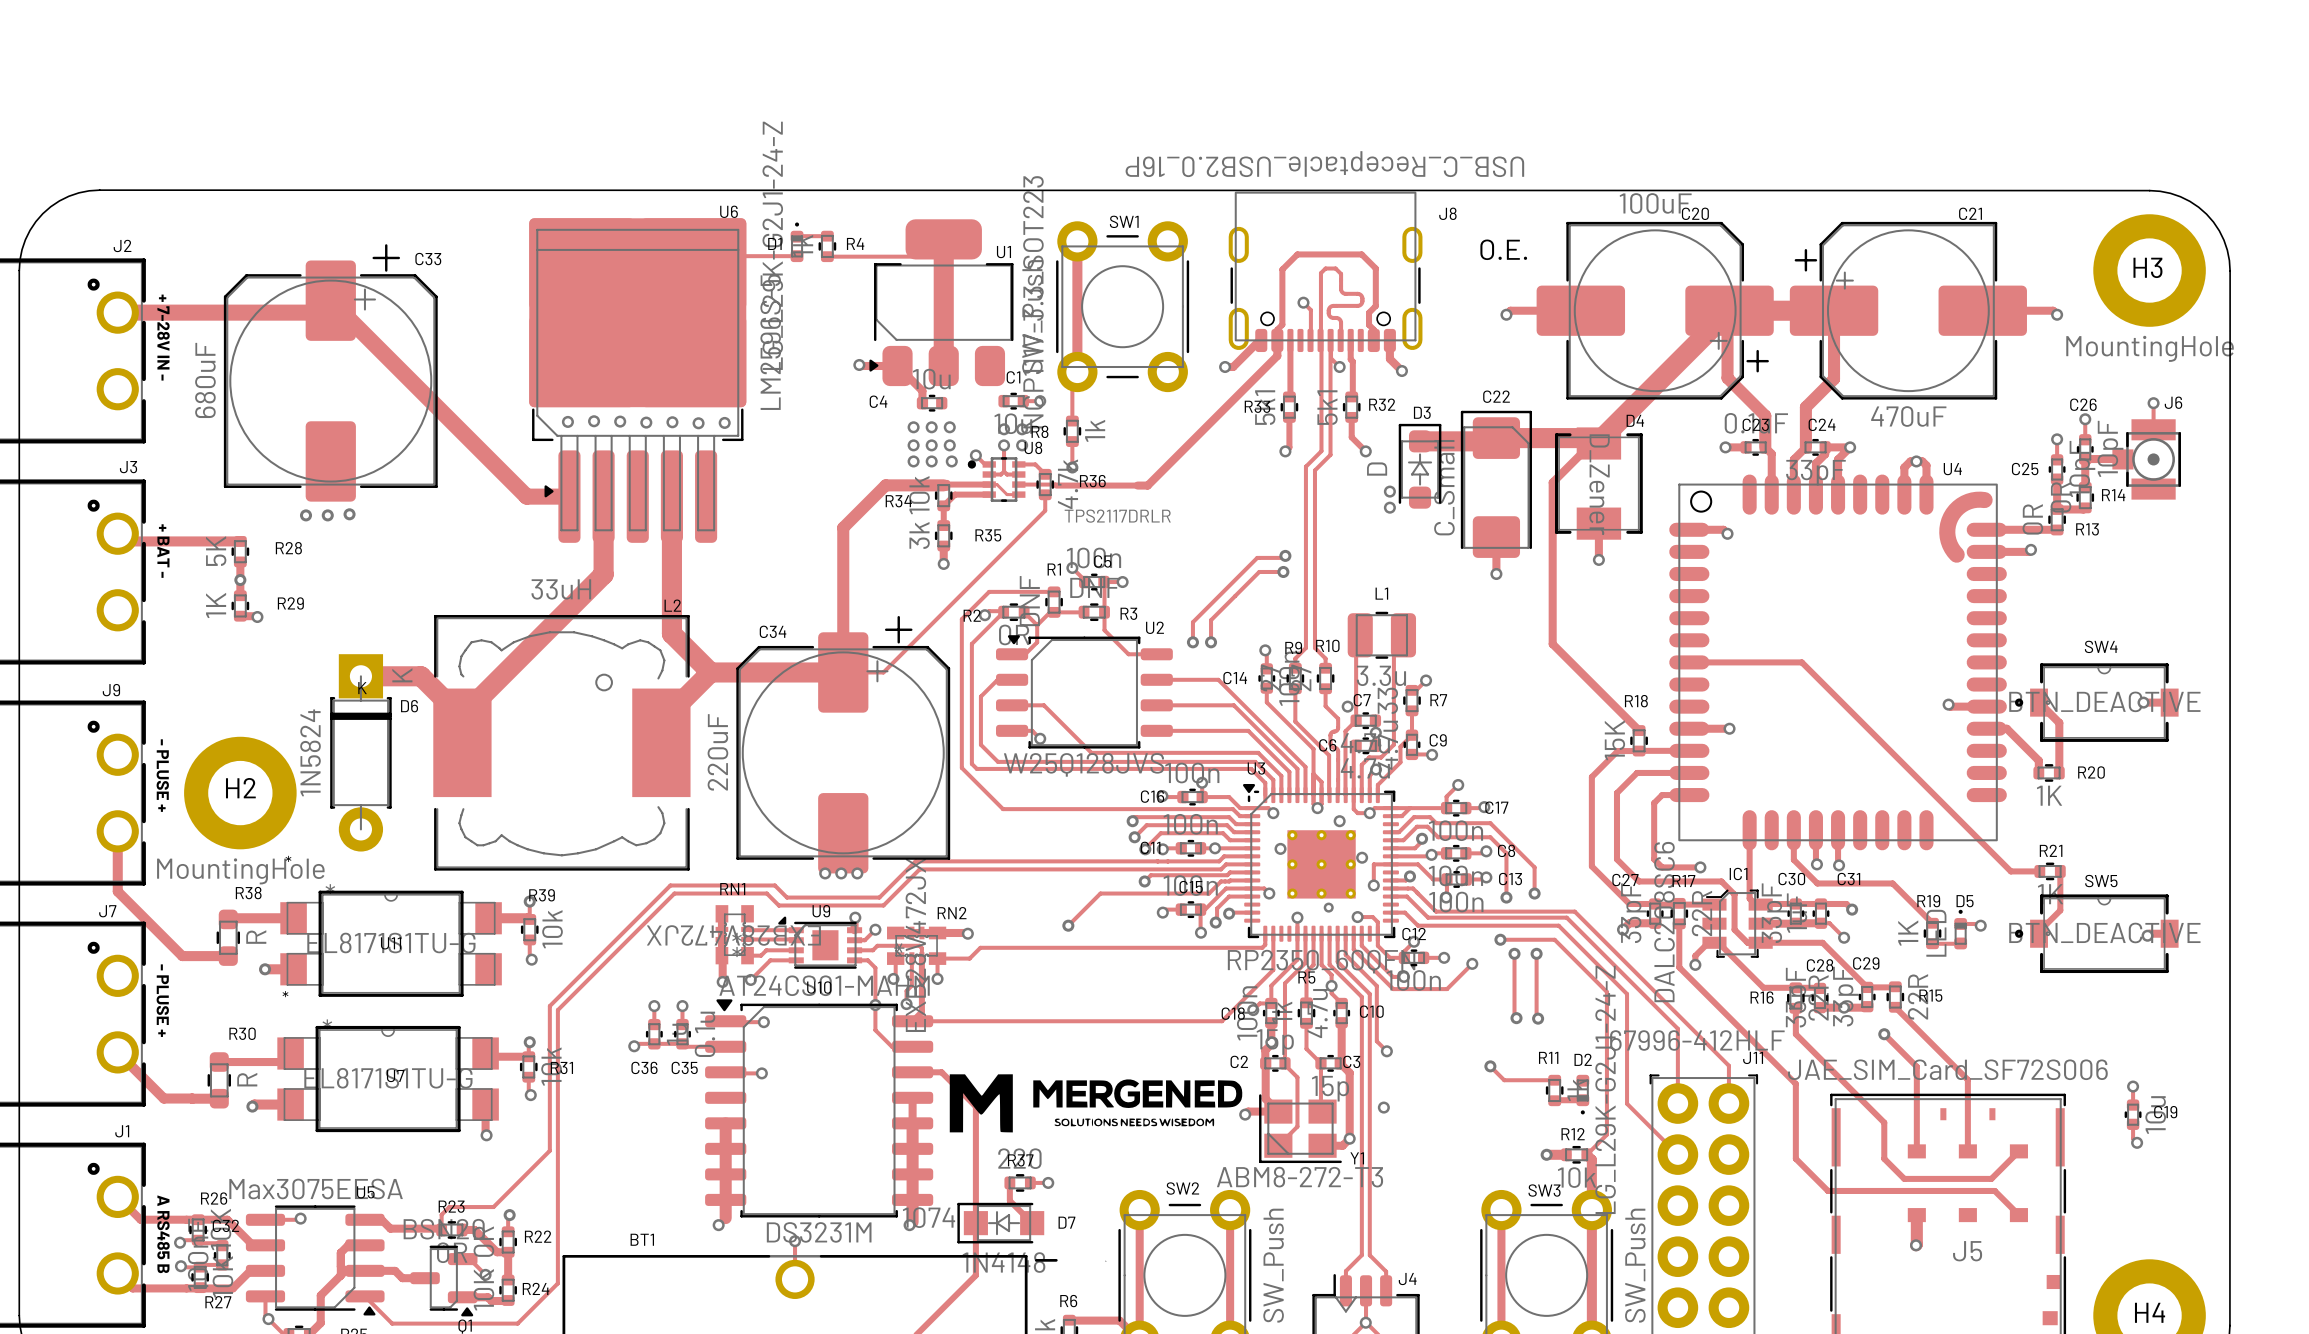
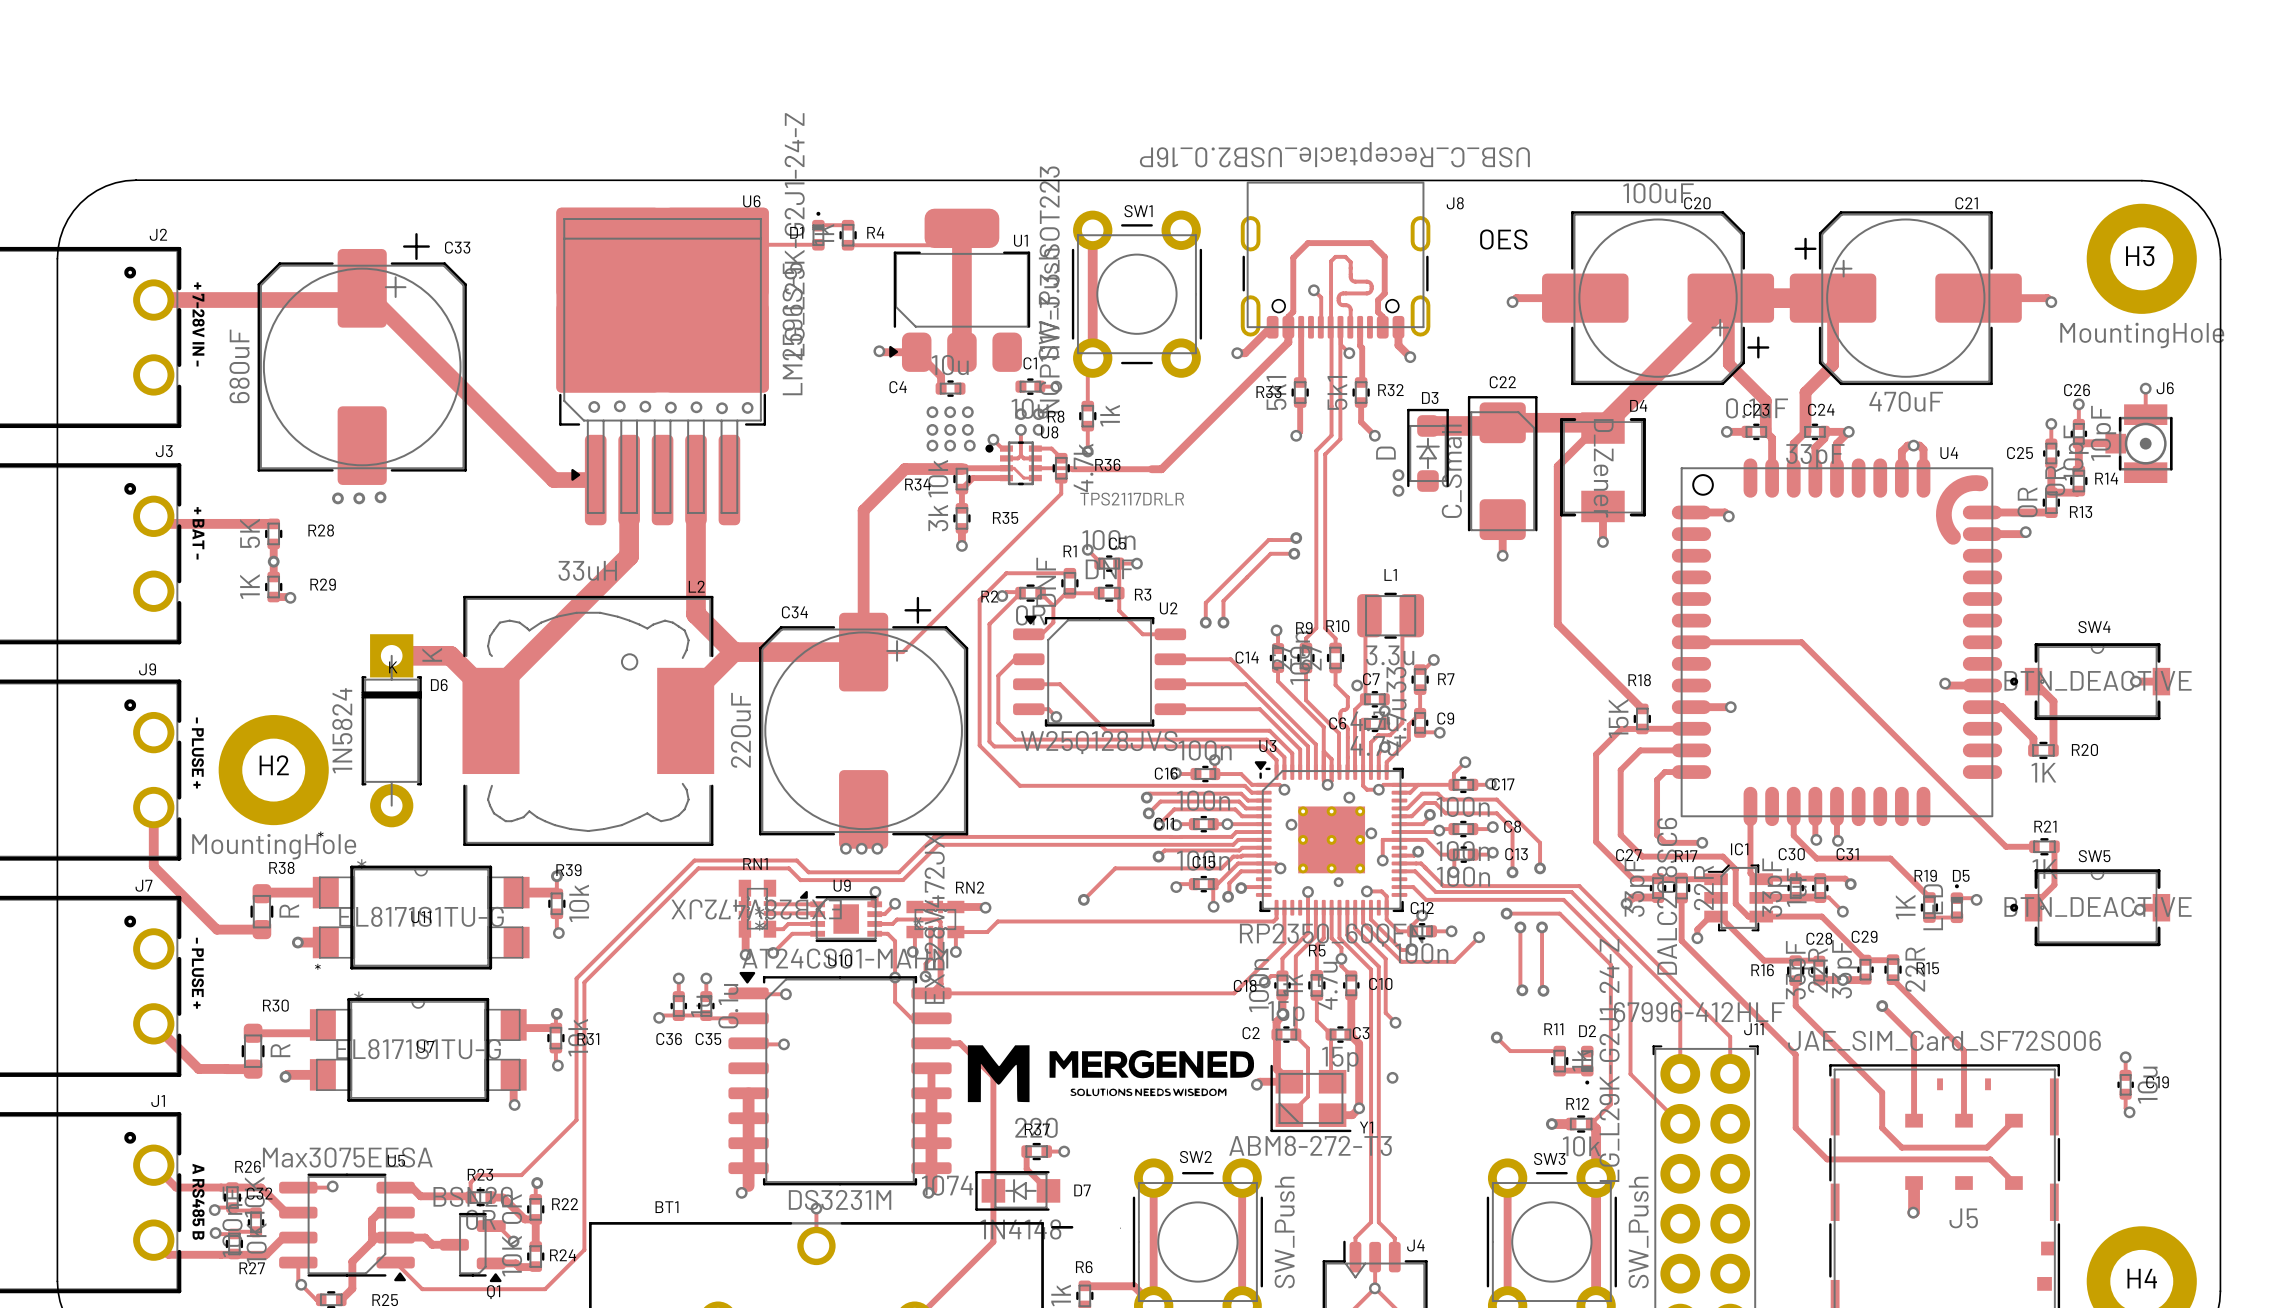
text: O.E. (1503, 249) -> OES (1503, 239)

